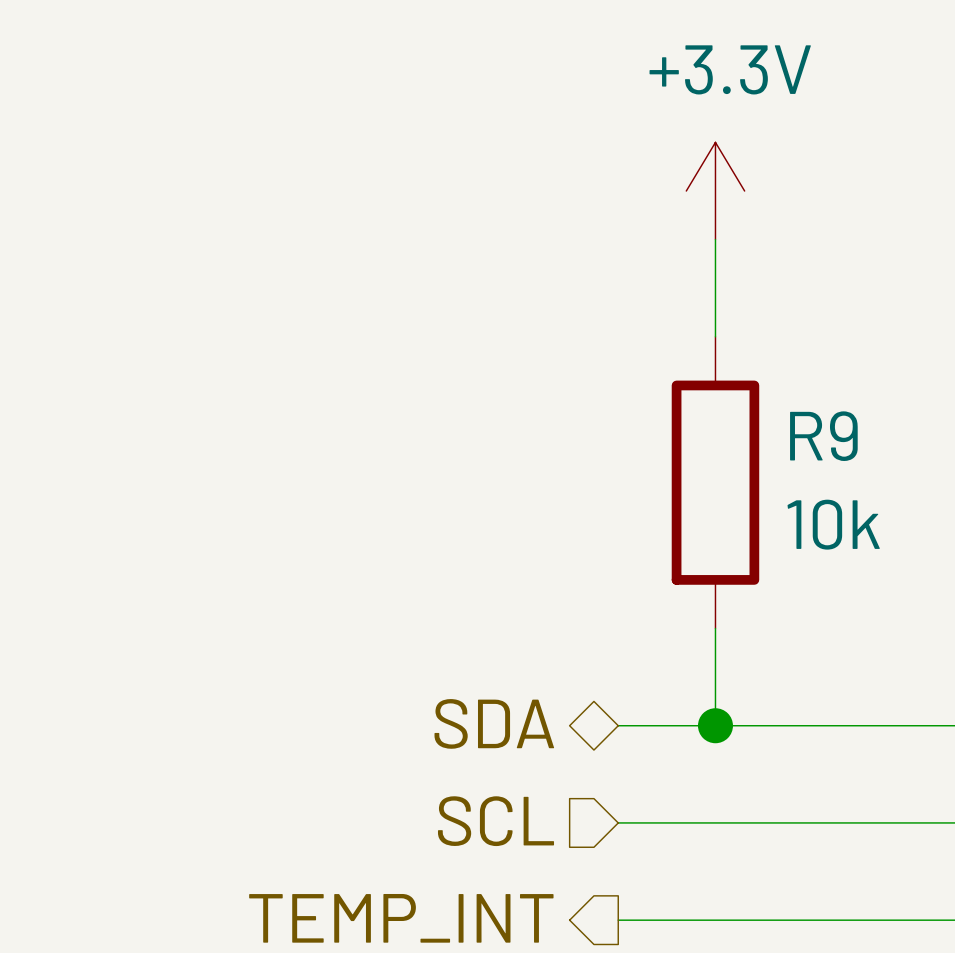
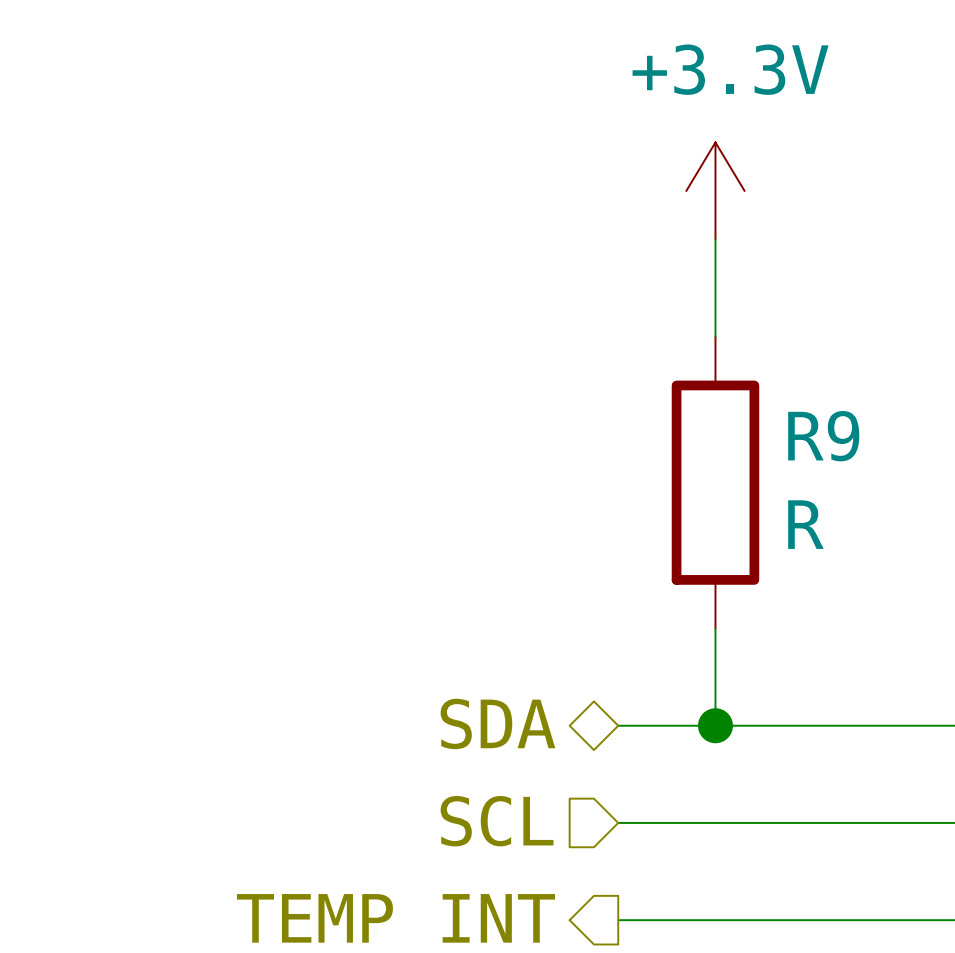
R9 value: 10k (833, 524) -> R (805, 524)

